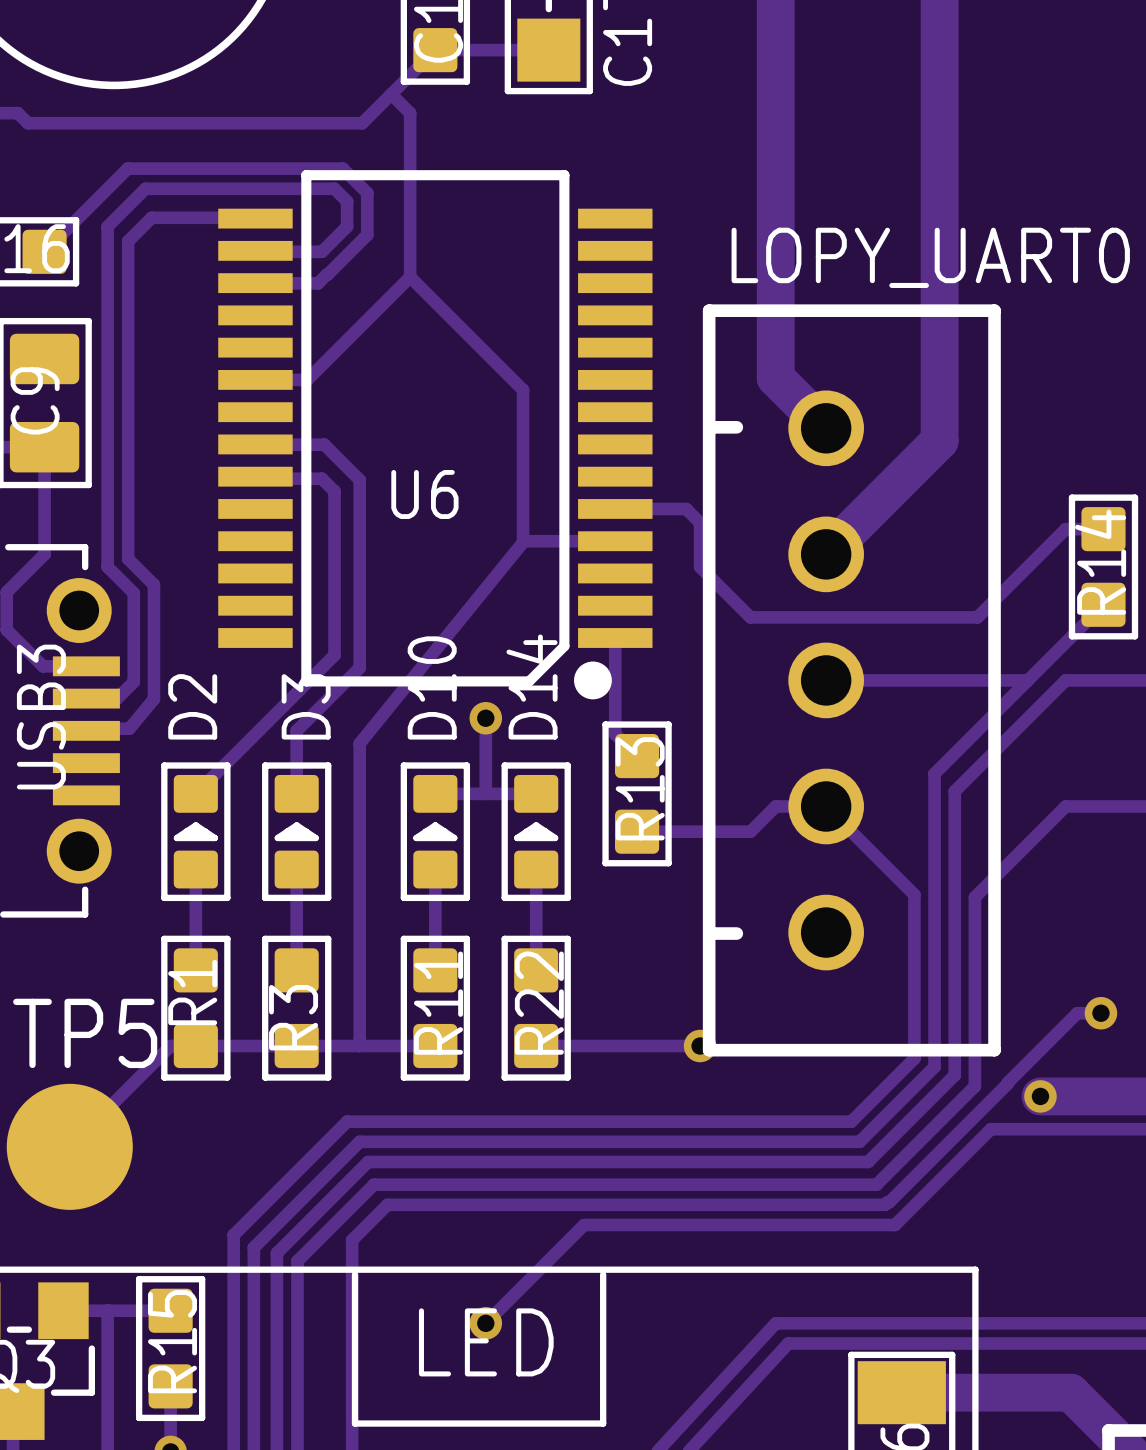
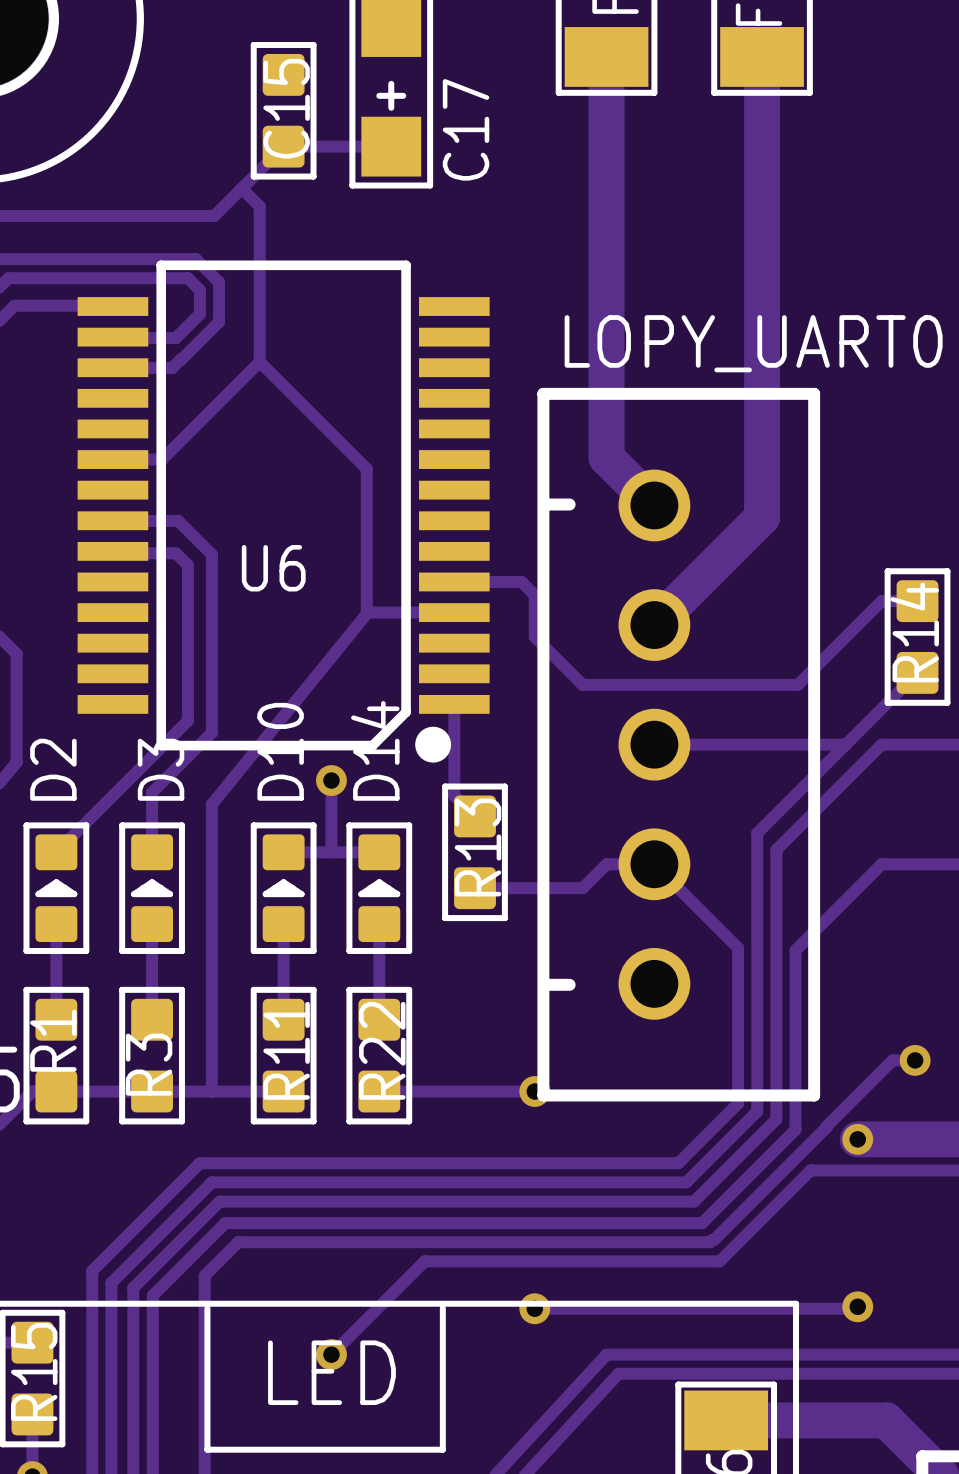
track: none -> (857, 1306) (855, 1308) (534, 1308)
via: none -> (857, 1306)
via: none -> (534, 1308)

